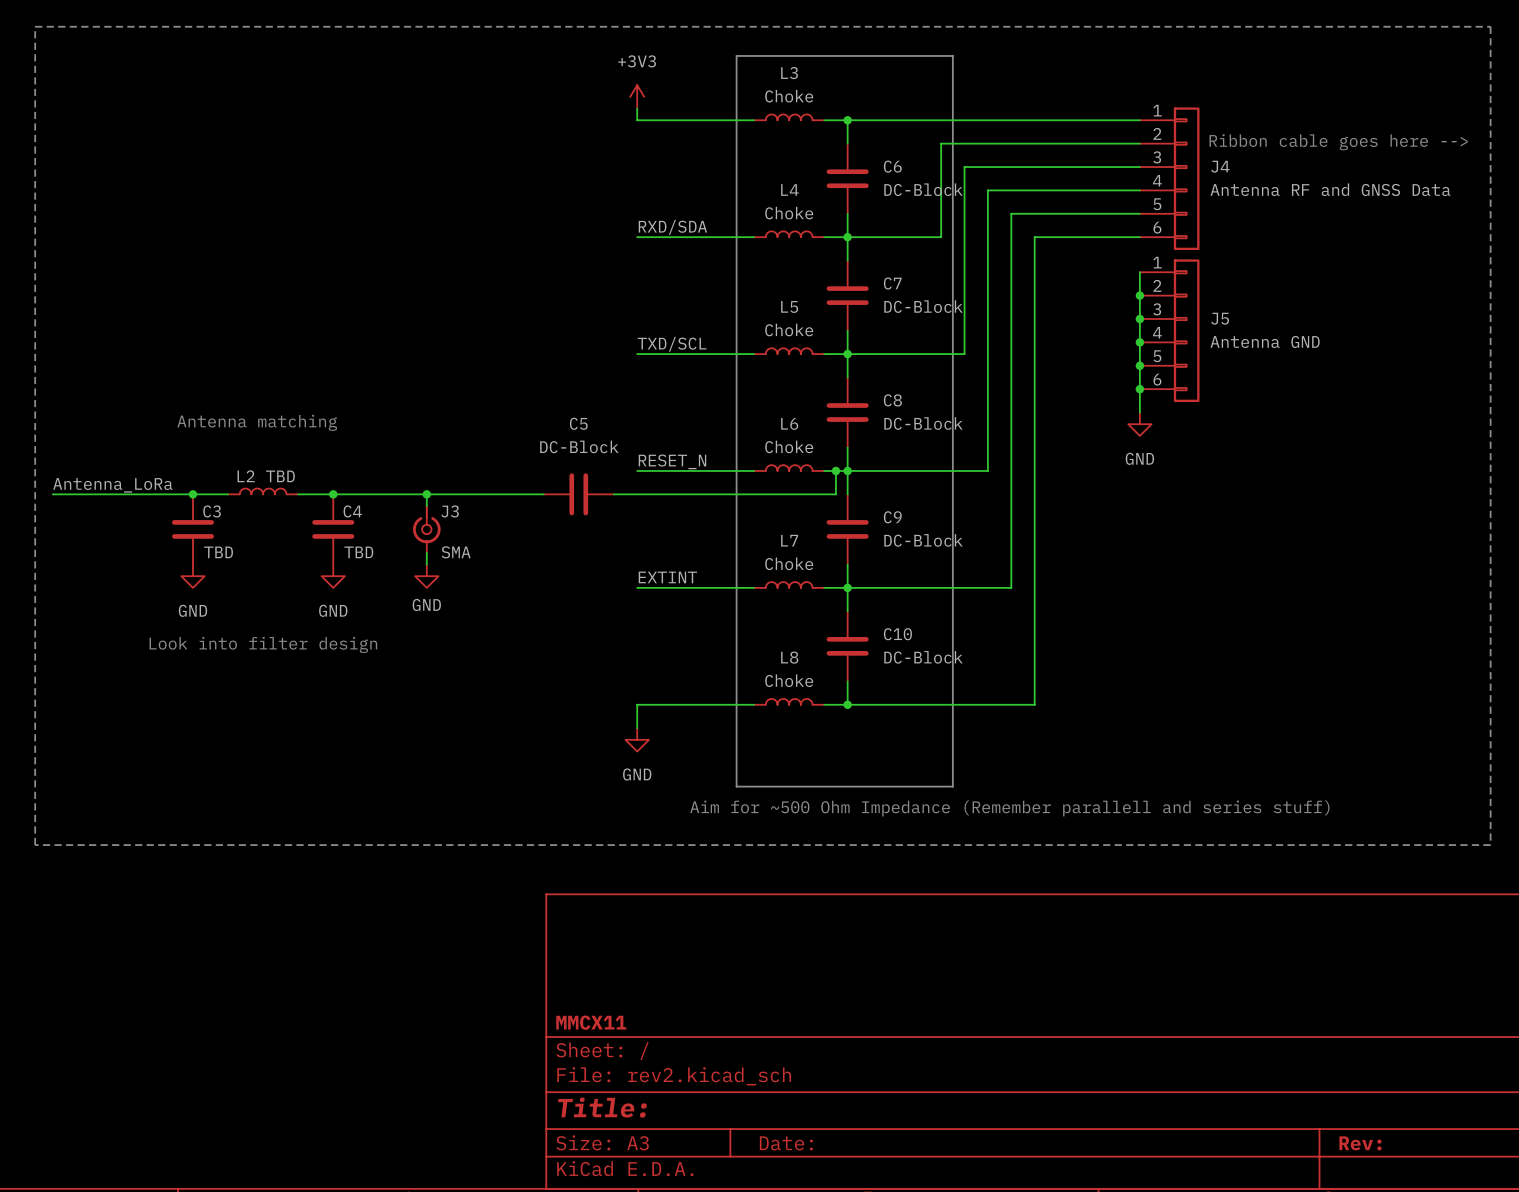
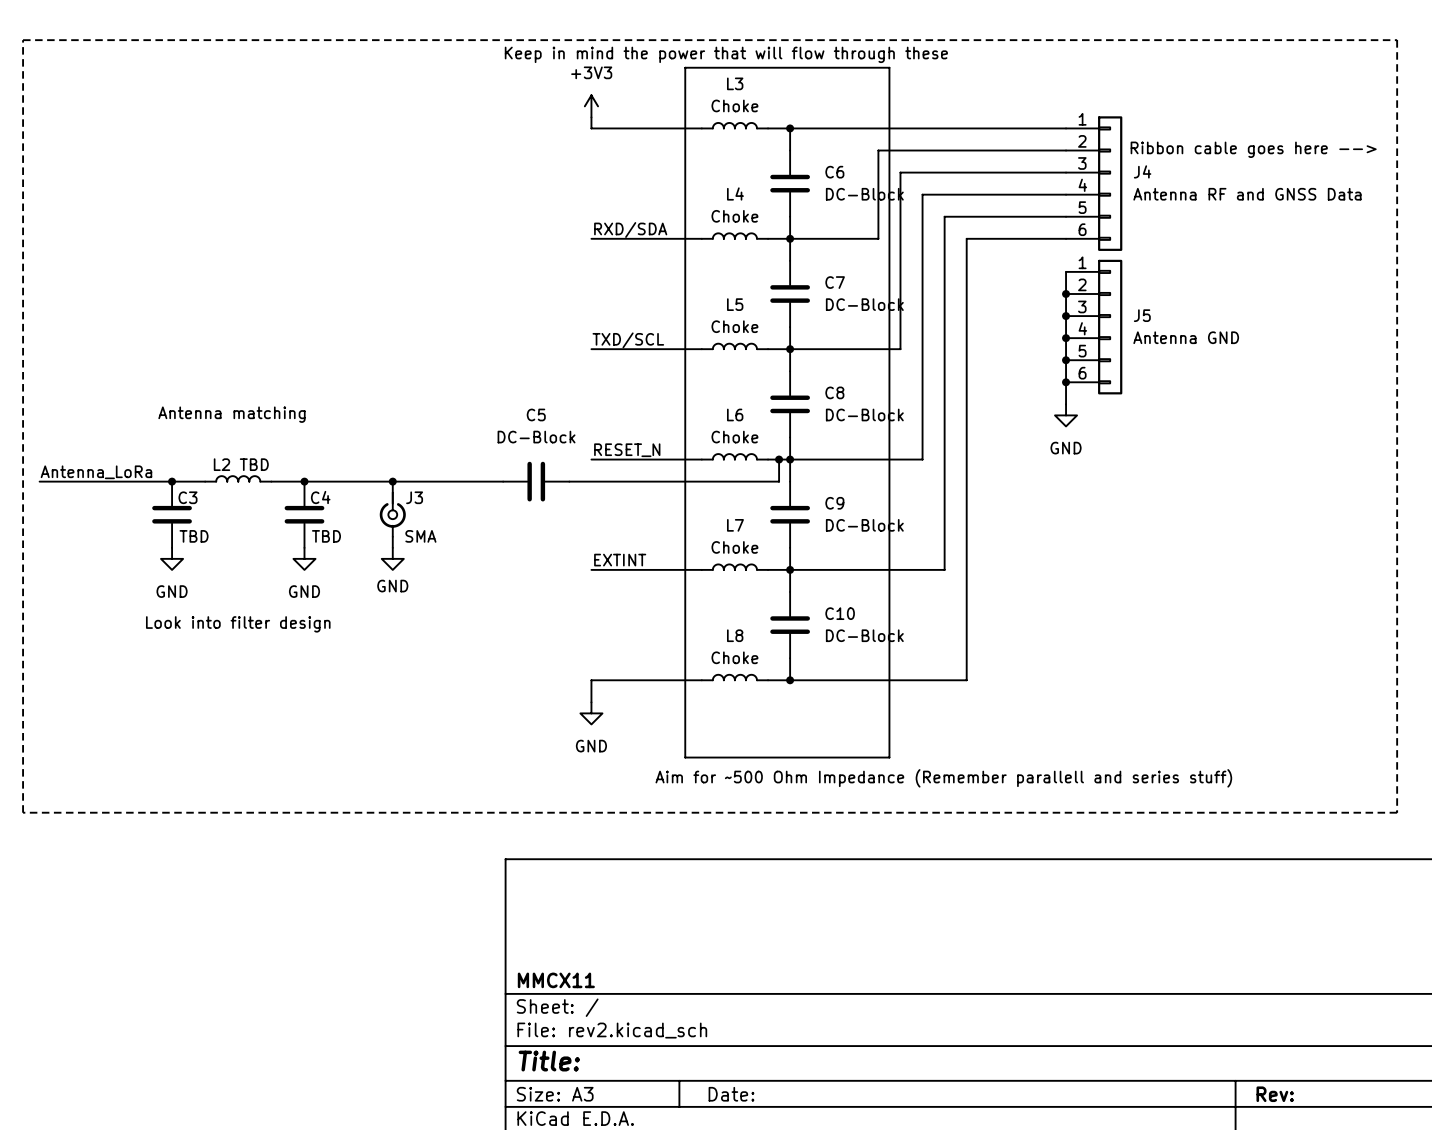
text: none -> Keep in mind the power that will flow through these (726, 54)

